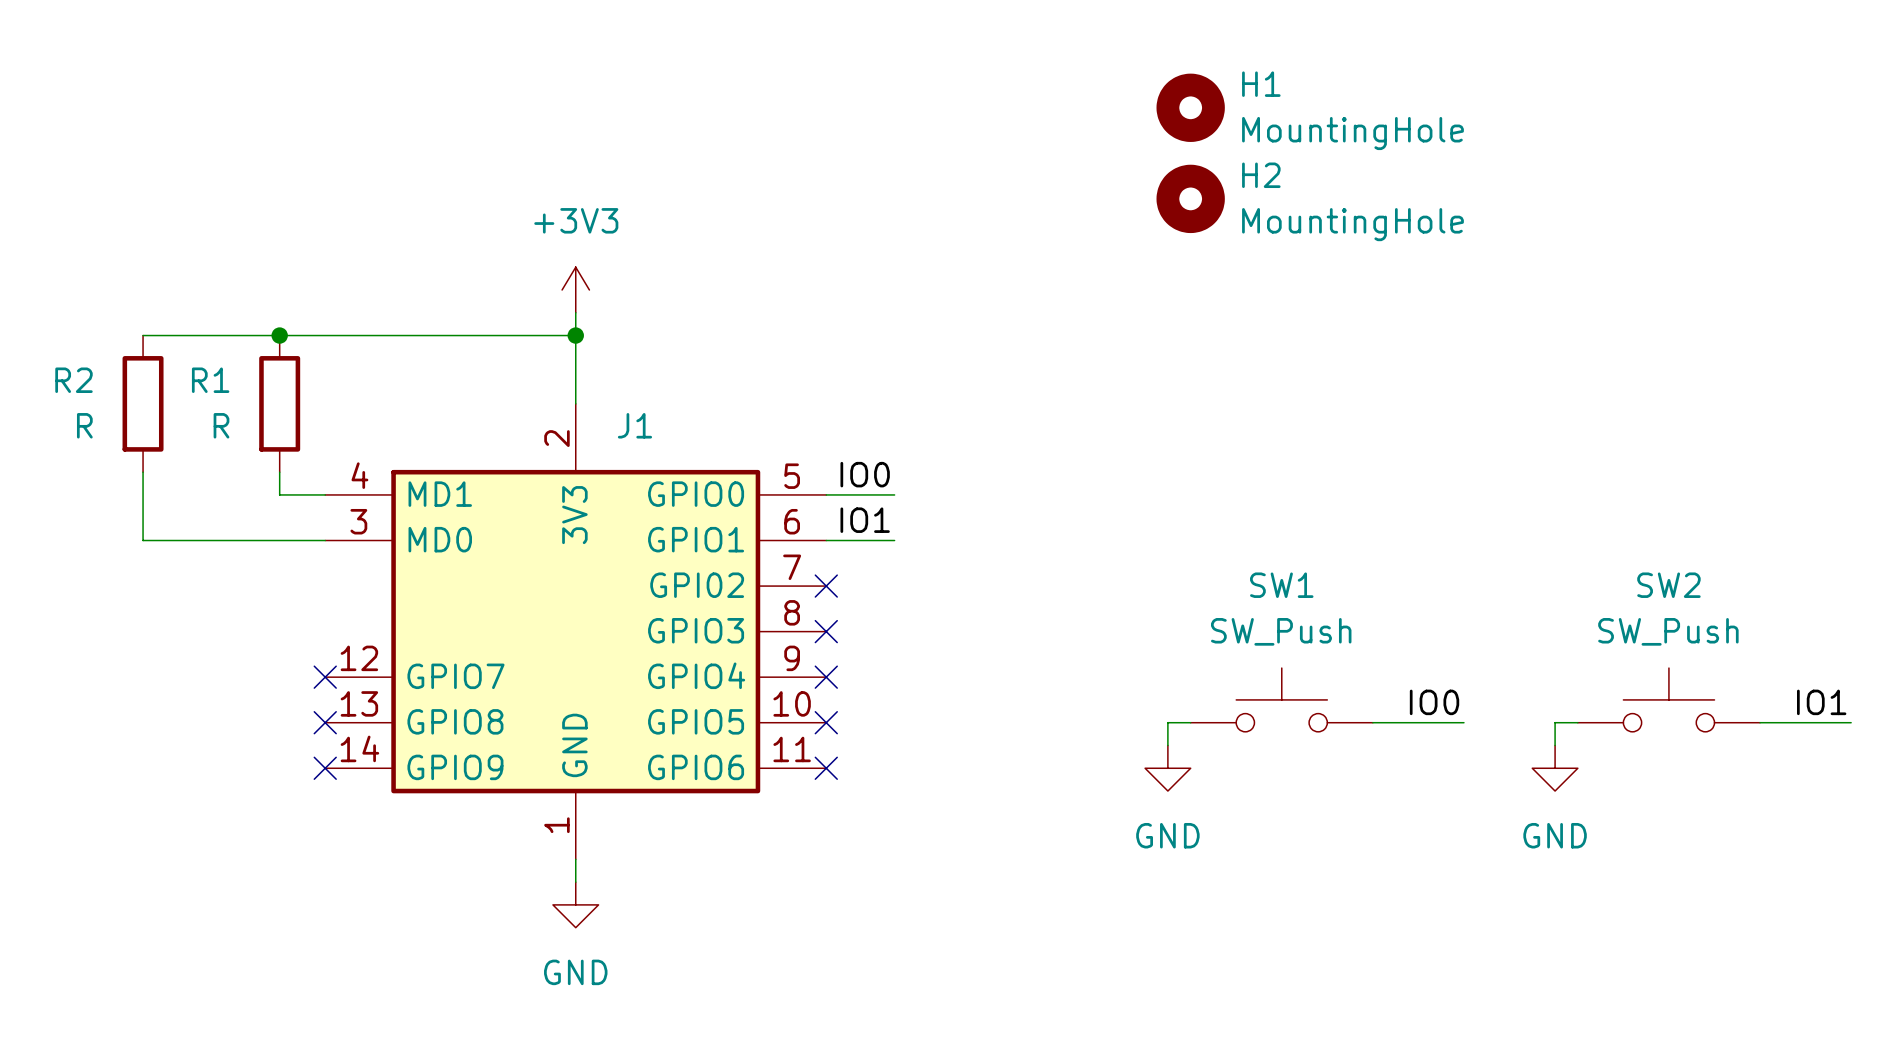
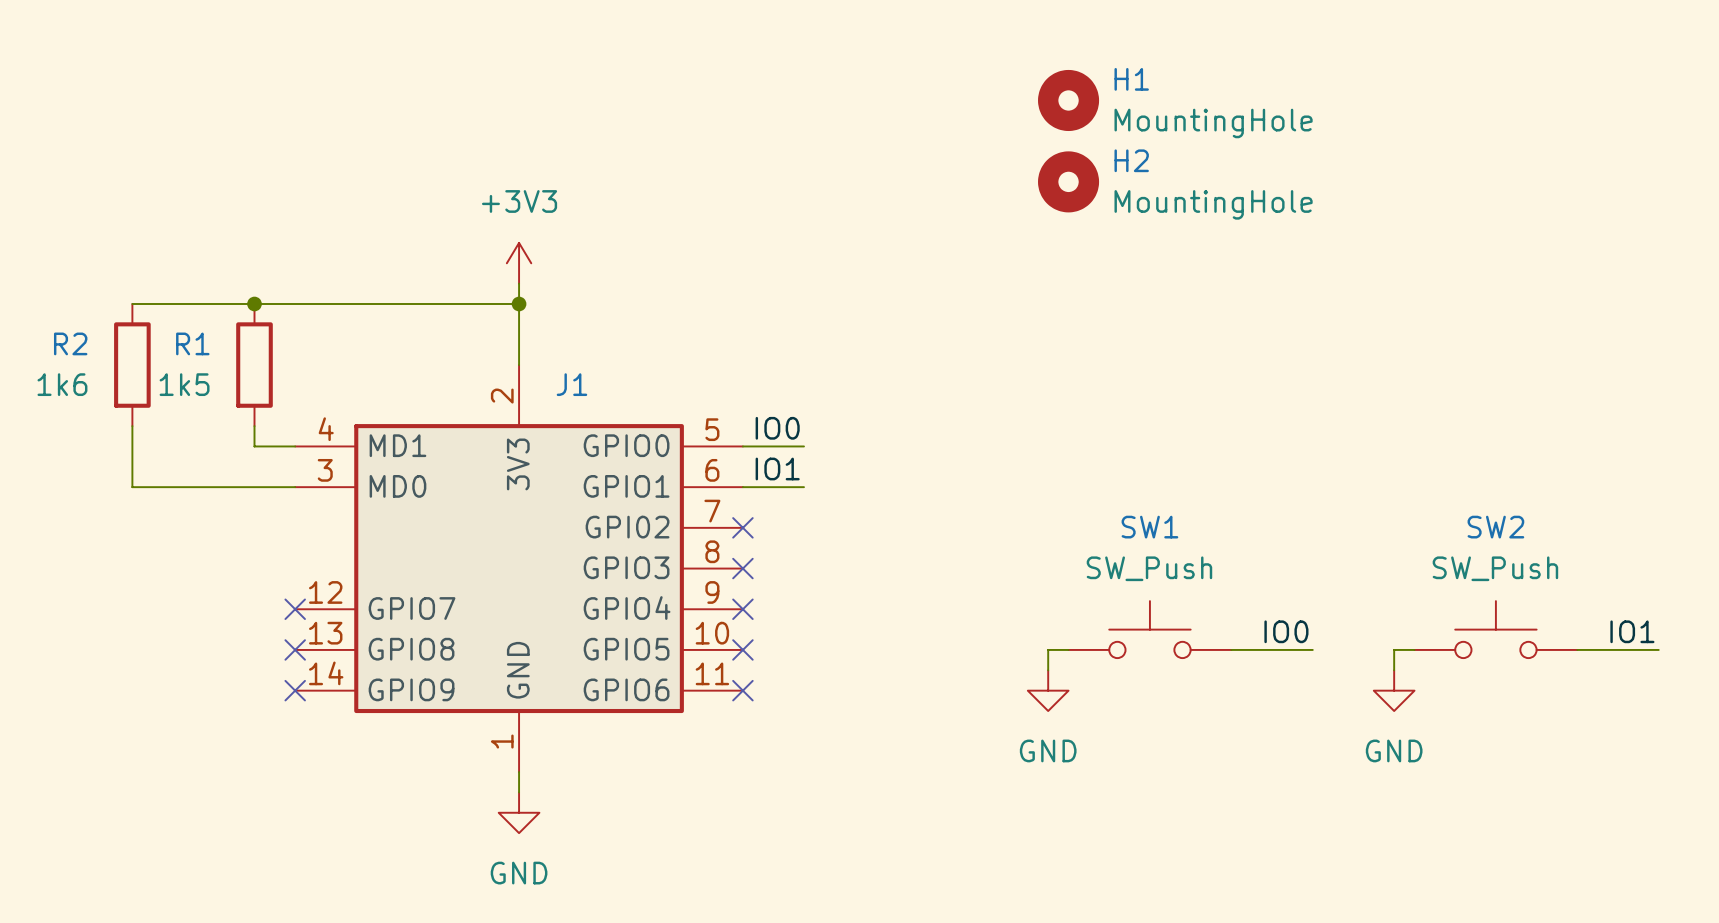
R2 value: R (84, 425) -> 1k6 (62, 384)
R1 value: R (221, 425) -> 1k5 (184, 384)

